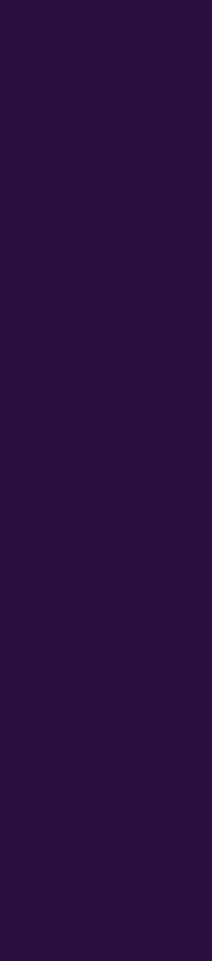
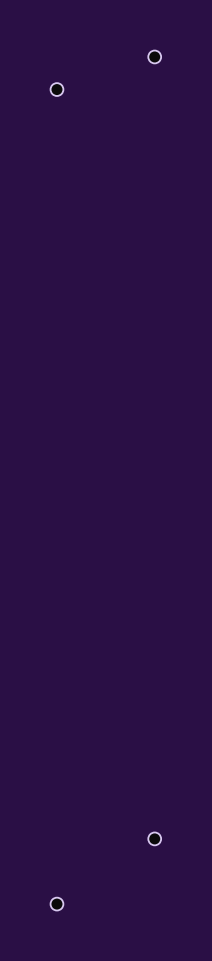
hole: none -> (154, 56)
hole: none -> (56, 89)
hole: none -> (154, 838)
hole: none -> (56, 904)

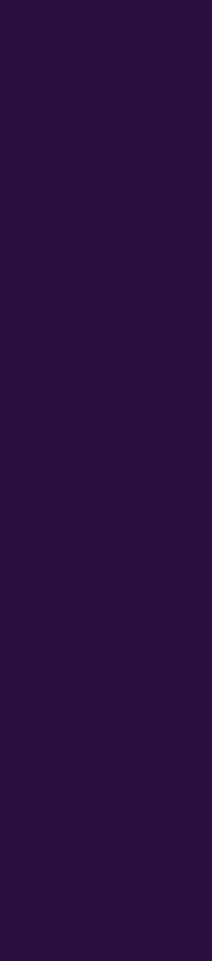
hole: (154, 56) -> none
hole: (56, 89) -> none
hole: (154, 838) -> none
hole: (56, 904) -> none

